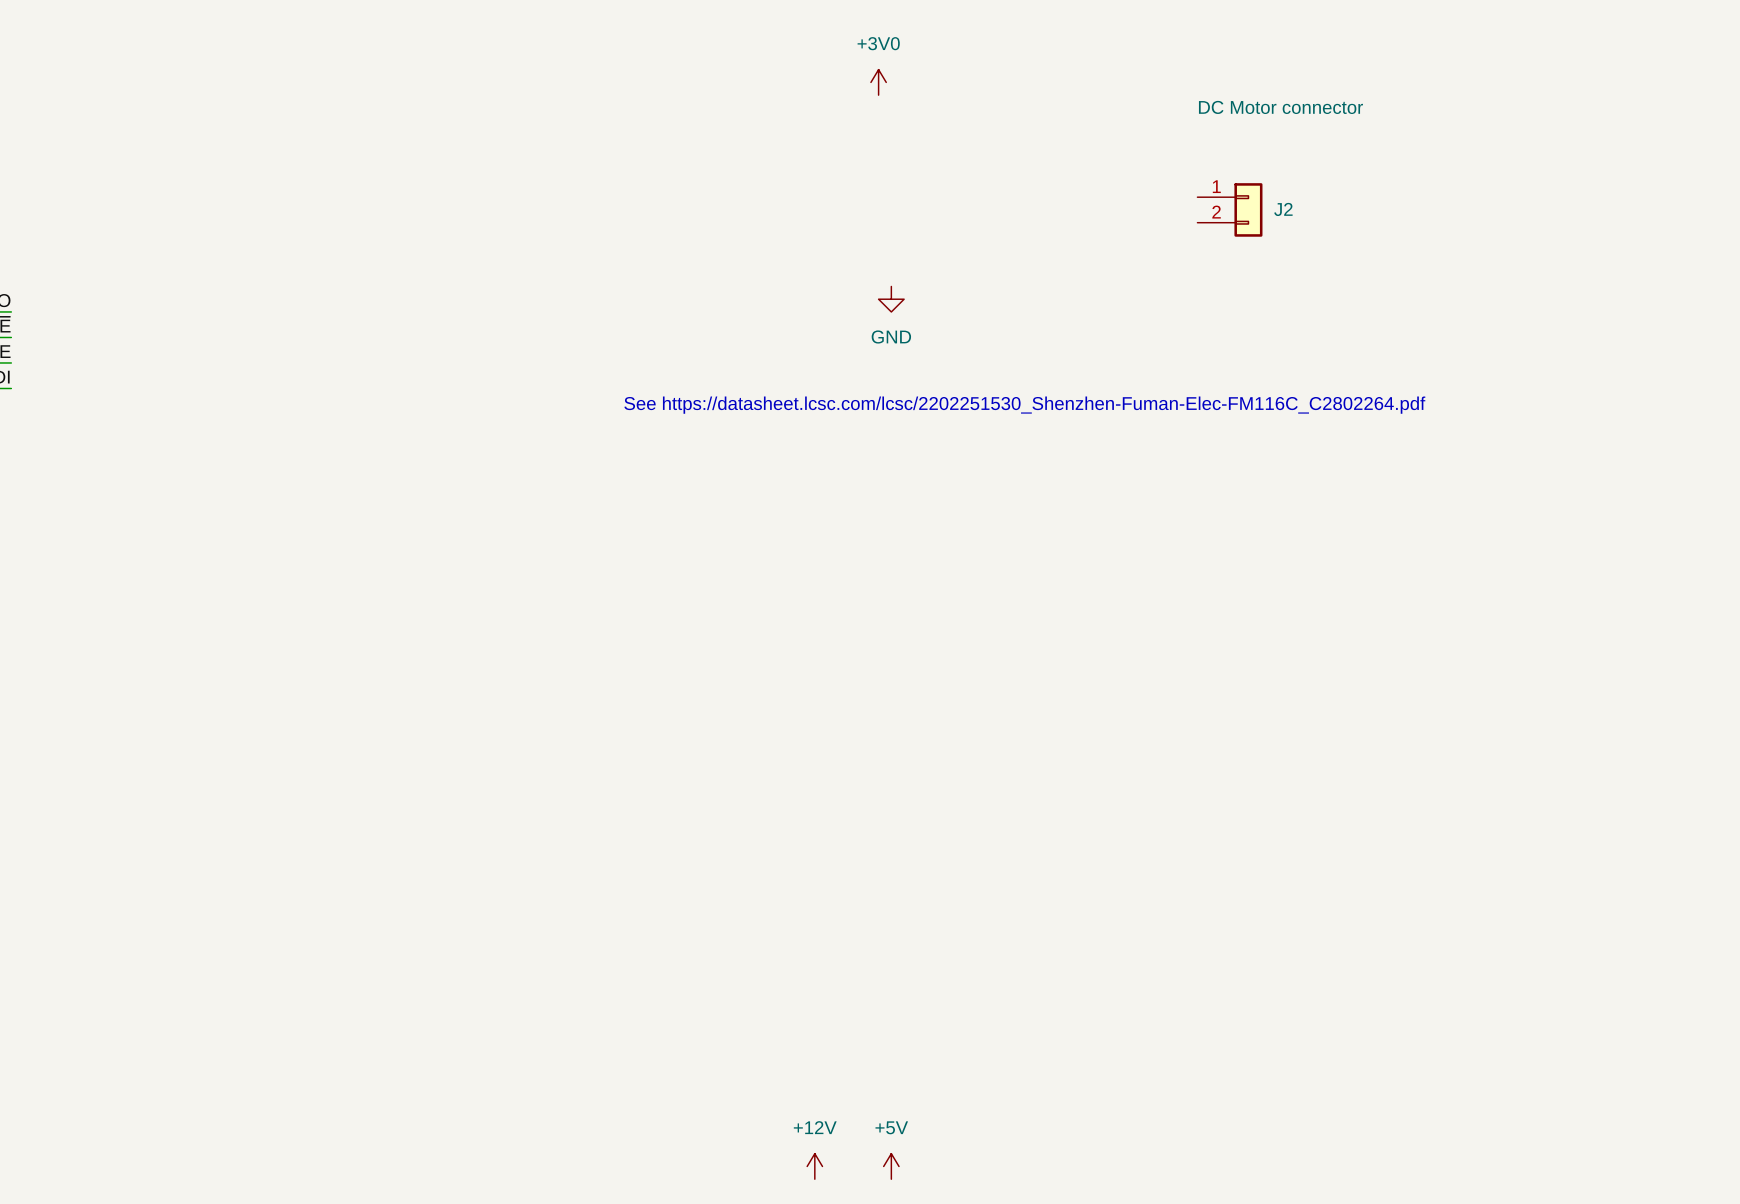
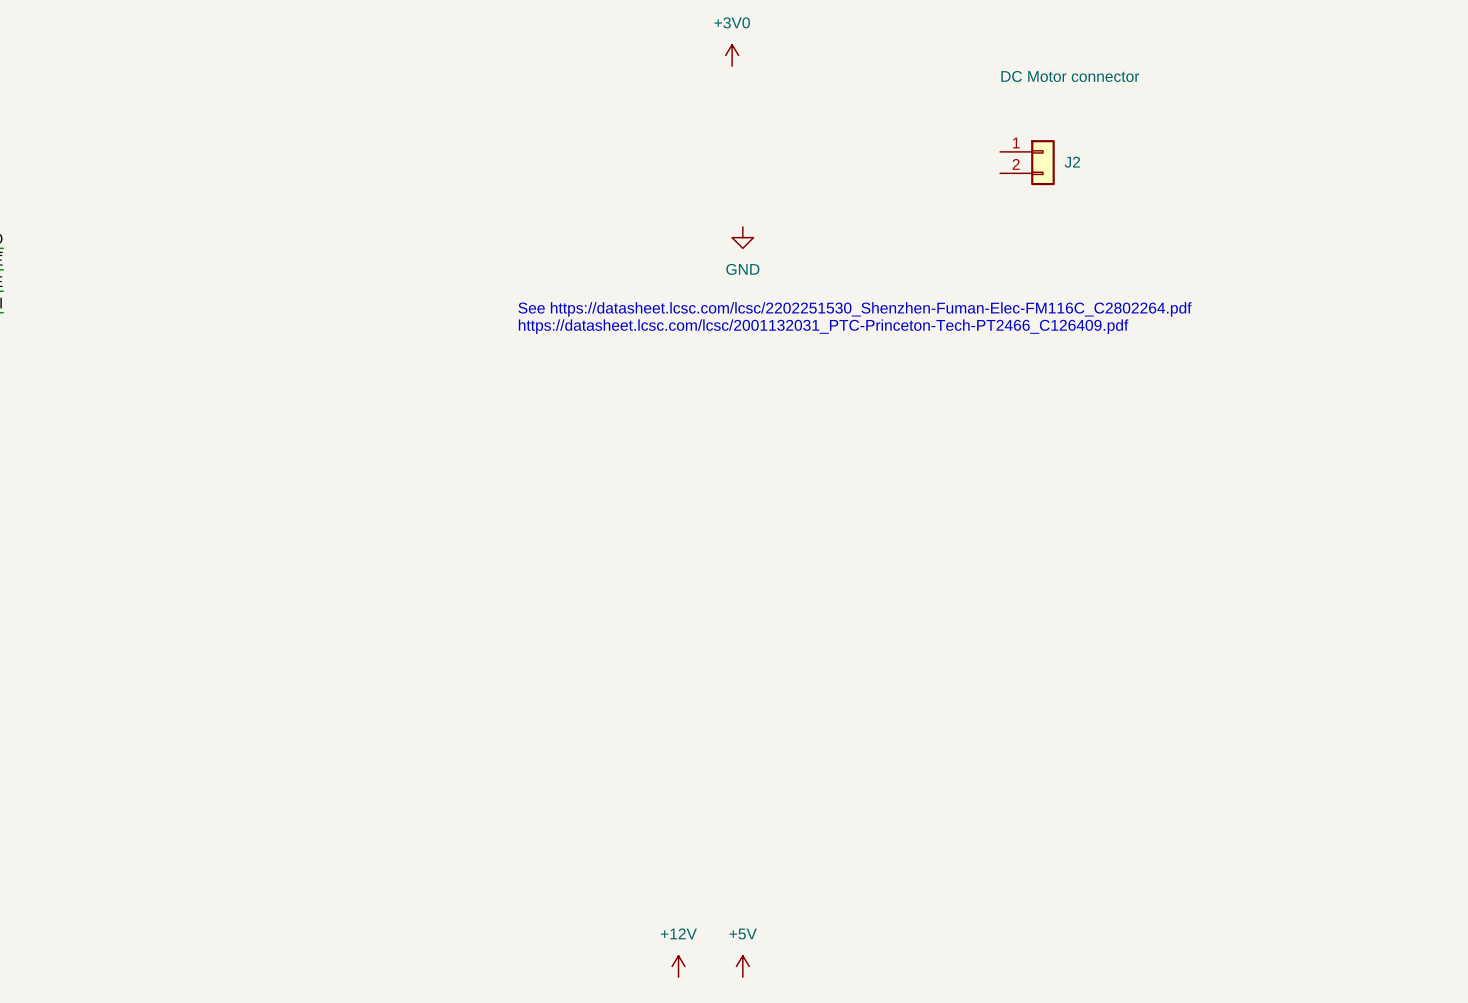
text: none -> See https://datasheet.lcsc.com/lcsc/2202251530_Shenzhen-Fuman-Elec-FM116C_C2802264.pdf (855, 309)
text: See https://datasheet.lcsc.com/lcsc/2202251530_Shenzhen-Fuman-Elec-FM116C_C2802264.pdf (1024, 405) -> https://datasheet.lcsc.com/lcsc/2001132031_PTC-Princeton-Tech-PT2466_C126409.pdf (823, 326)

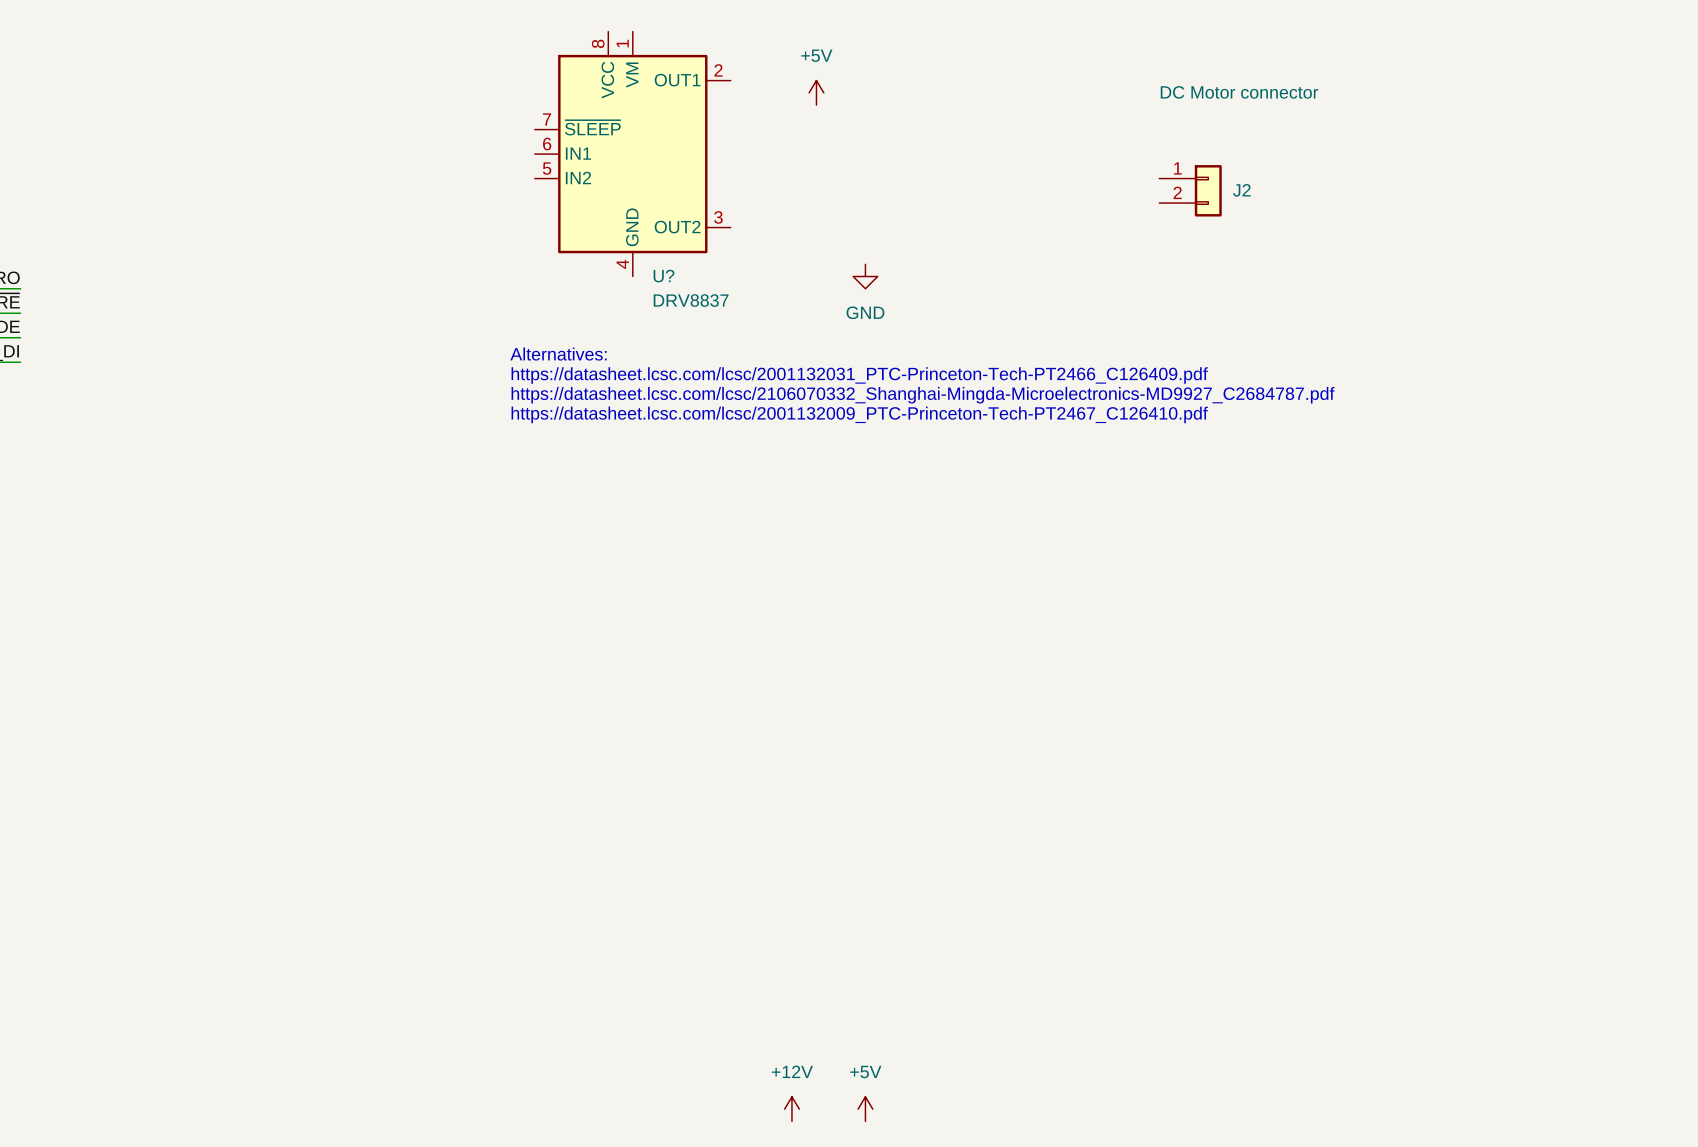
power symbol: +3V0 (732, 55) -> none
power symbol: none -> +5V (816, 92)
U?: none -> DRV8837 (632, 154)
text: none -> Alternatives: (558, 354)
text: See https://datasheet.lcsc.com/lcsc/2202251530_Shenzhen-Fuman-Elec-FM116C_C2802264.pdf (855, 309) -> none
text position: https://datasheet.lcsc.com/lcsc/2001132031_PTC-Princeton-Tech-PT2466_C126409.pdf (823, 326) -> https://datasheet.lcsc.com/lcsc/2001132031_PTC-Princeton-Tech-PT2466_C126409.pdf (859, 375)
text: none -> https://datasheet.lcsc.com/lcsc/2106070332_Shanghai-Mingda-Microelectronics-MD9927_C2684787.pdf (923, 395)
text: none -> https://datasheet.lcsc.com/lcsc/2001132009_PTC-Princeton-Tech-PT2467_C126410.pdf (859, 414)

